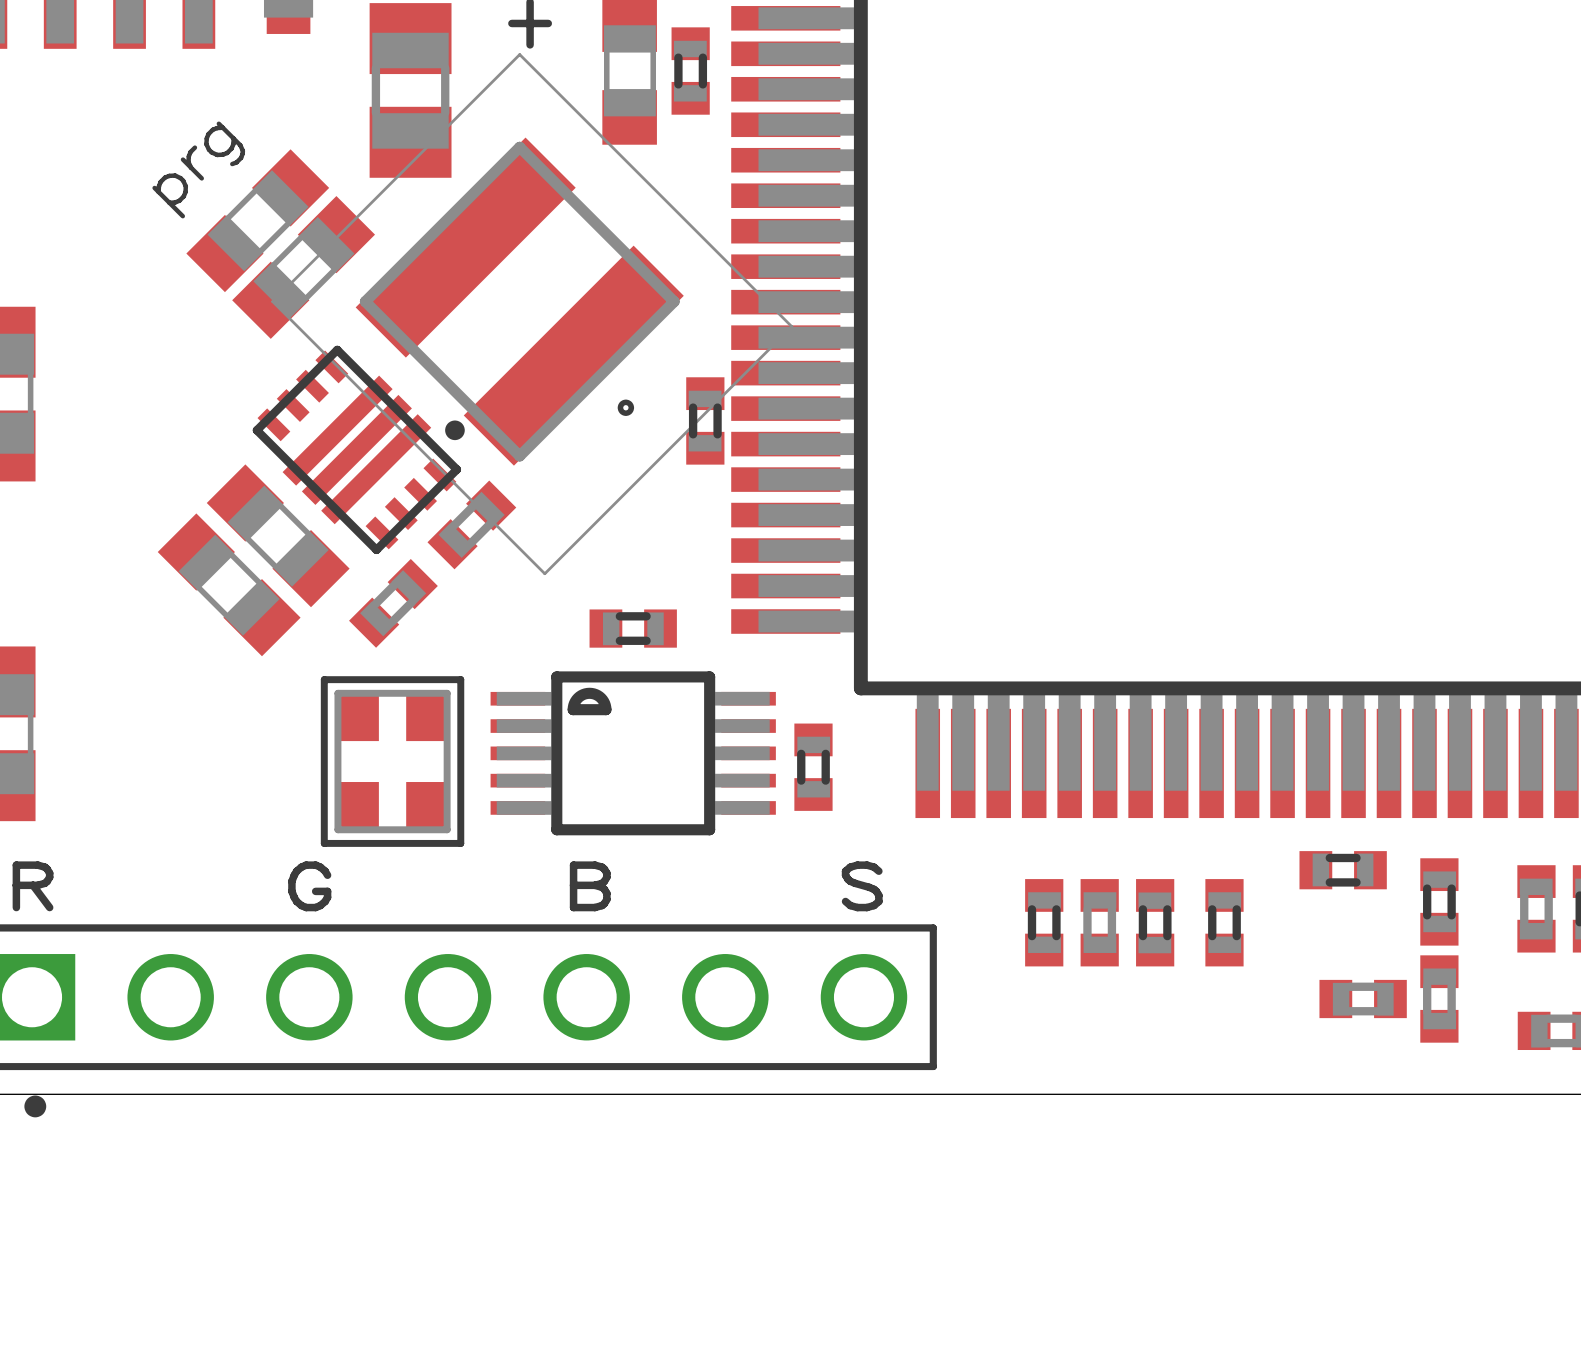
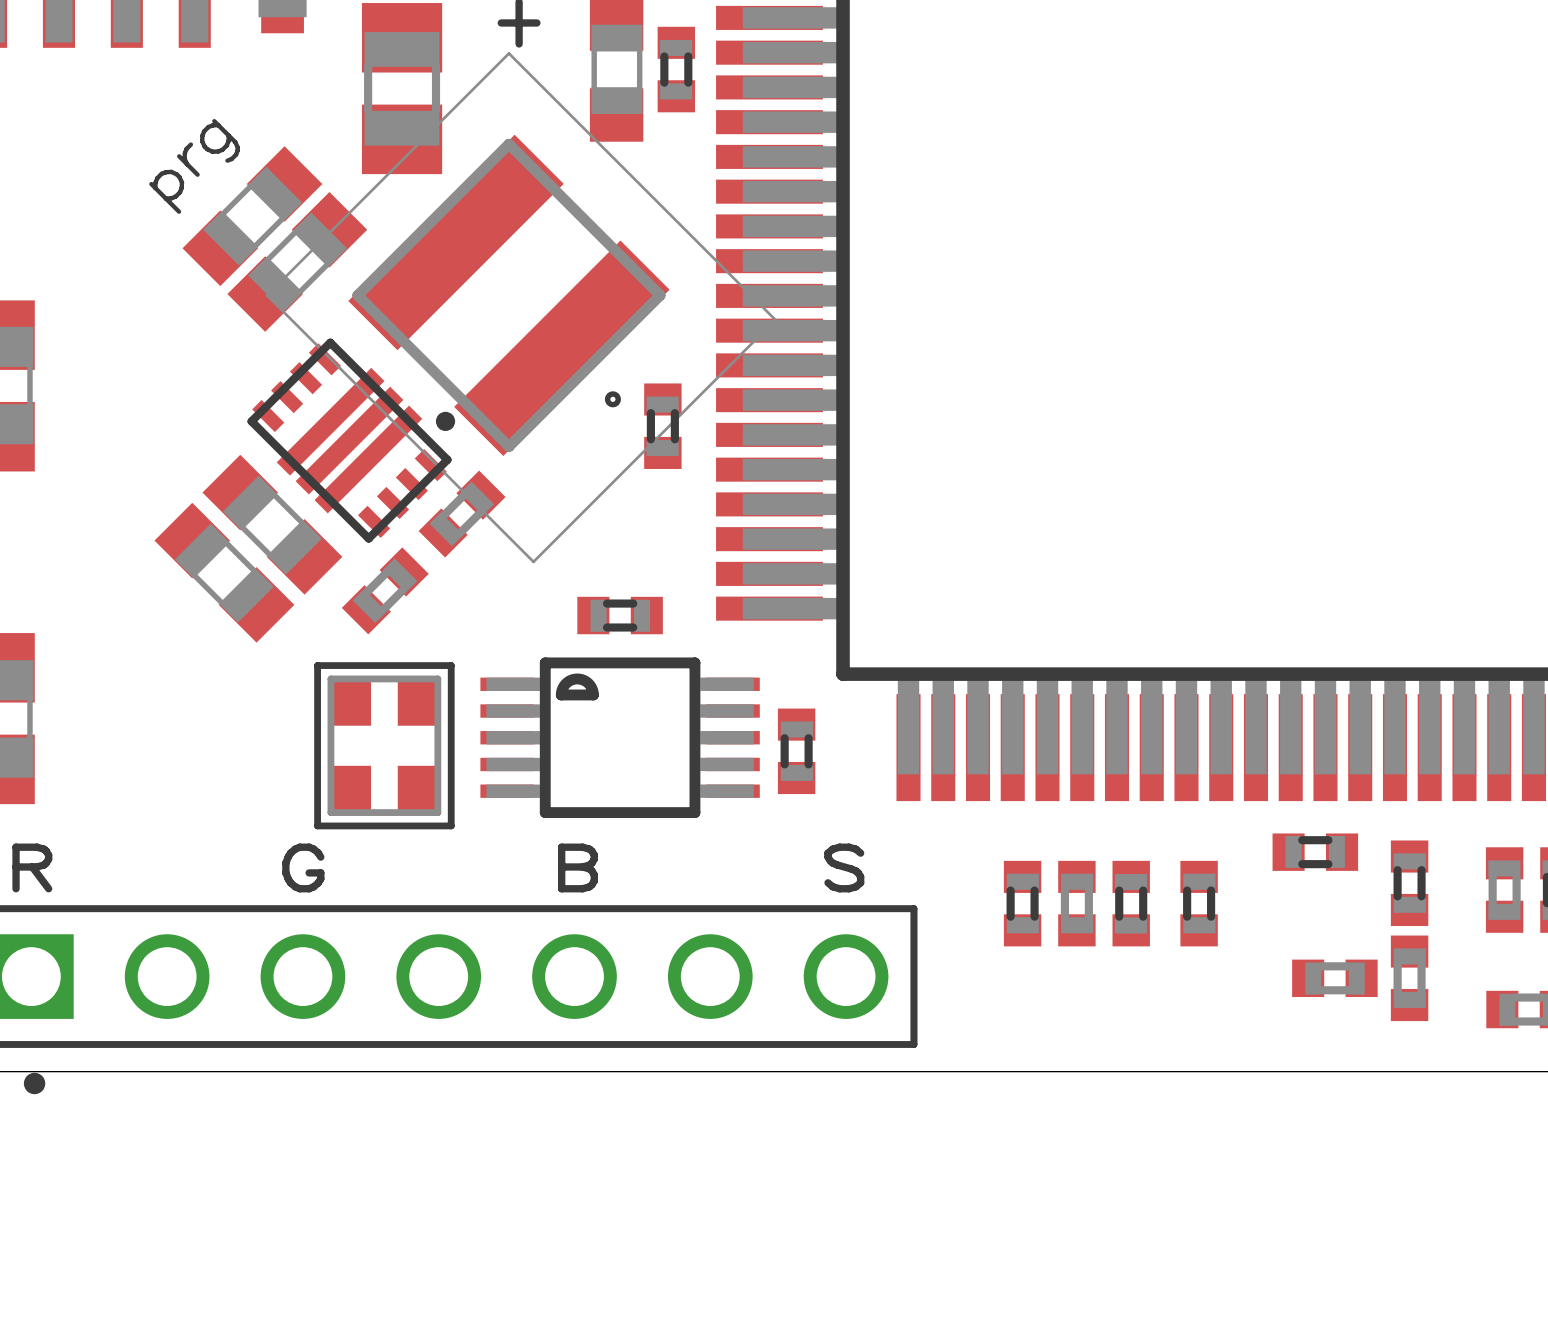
part position: (705, 420) -> (662, 426)

